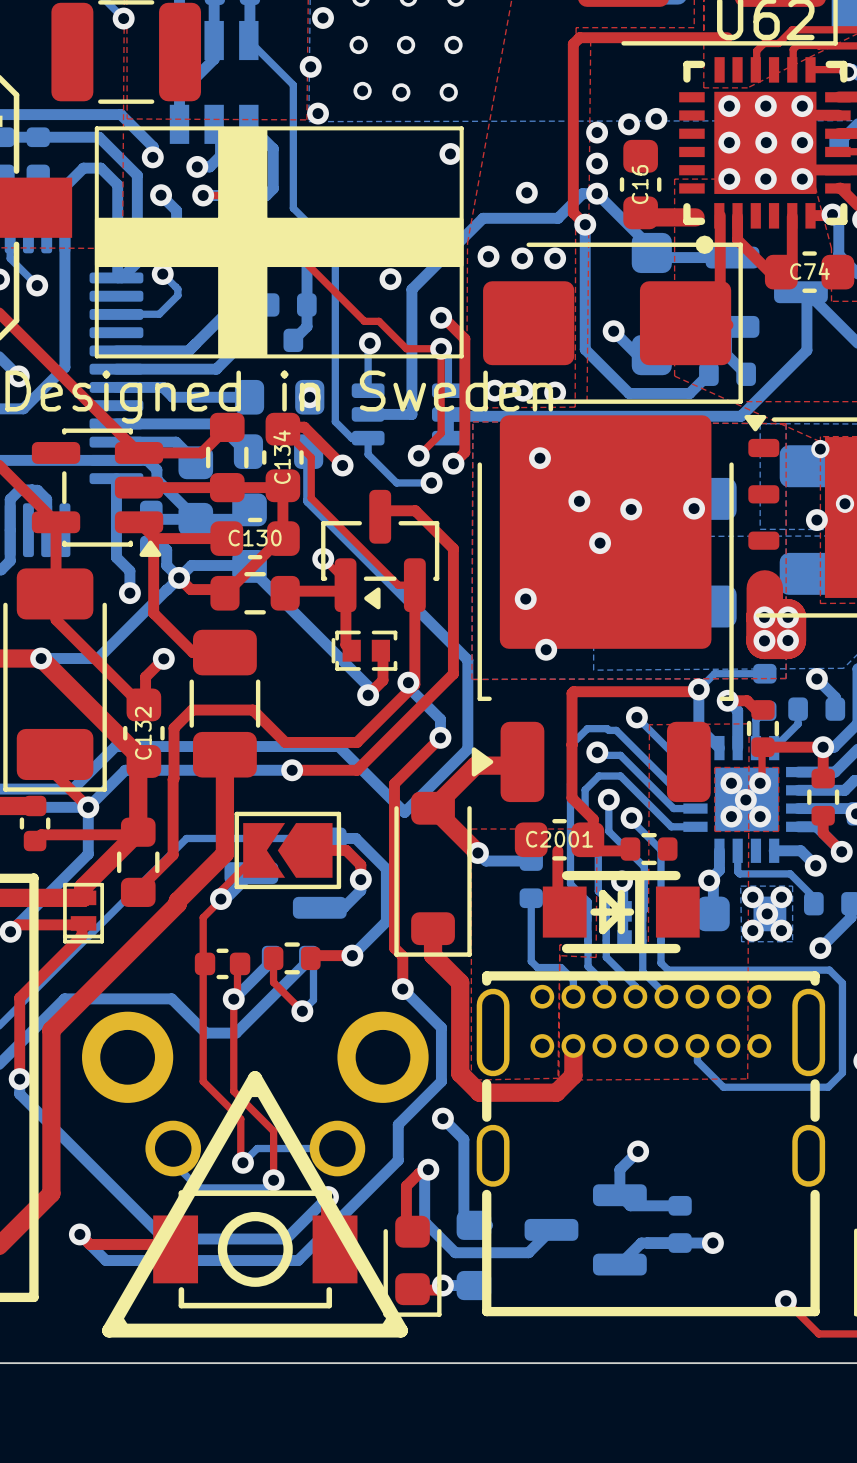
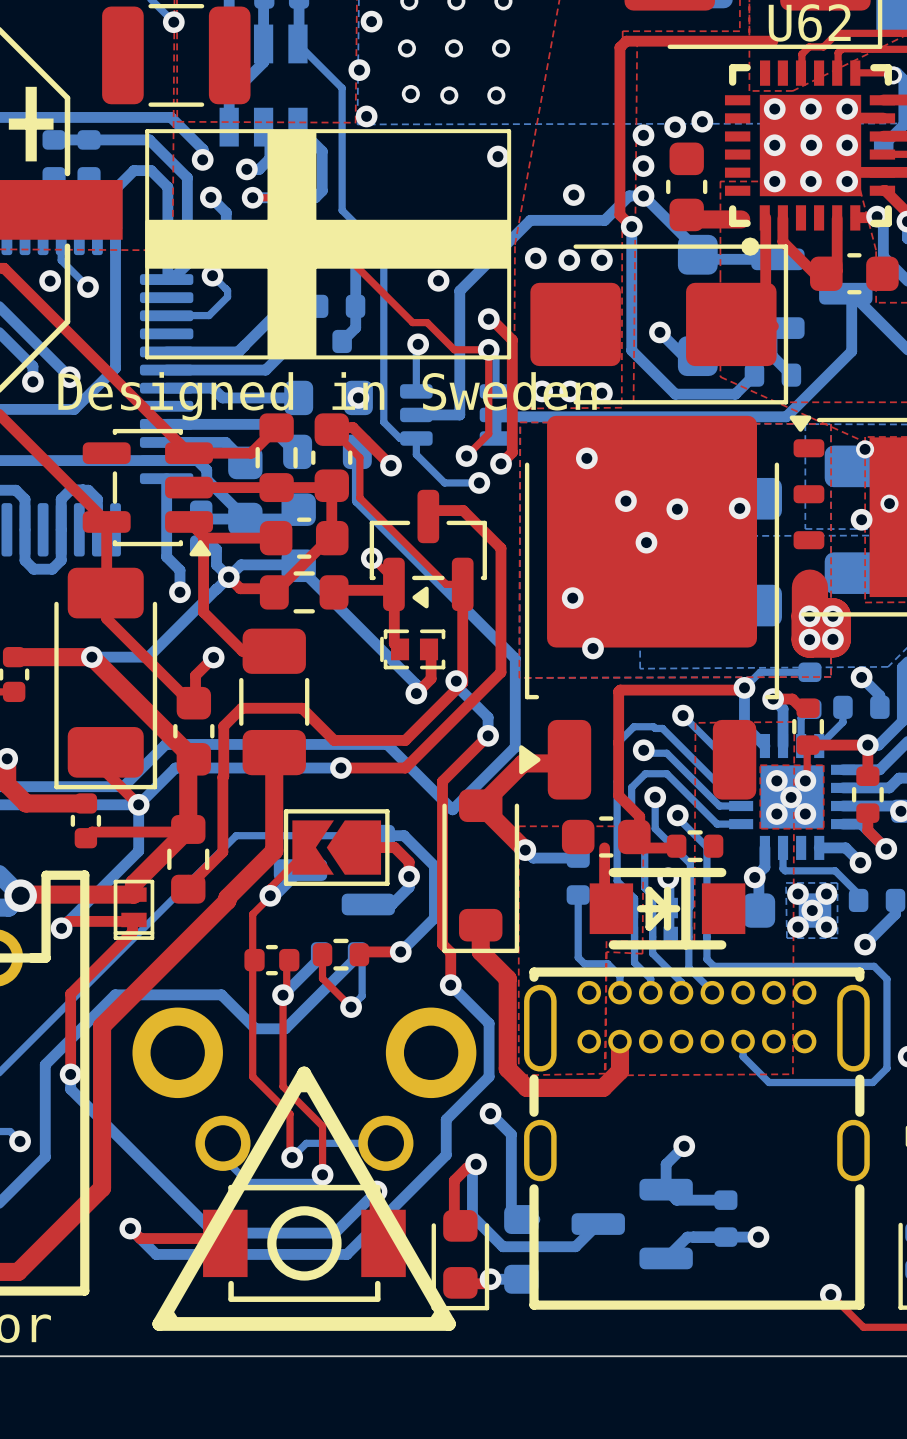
C16 name: C16 (640, 184) -> none
C74 name: C74 (809, 271) -> none
C134 name: C134 (282, 457) -> none
C130 name: C130 (255, 538) -> none
C132 name: C132 (143, 733) -> none
C2001 name: C2001 (559, 839) -> none

